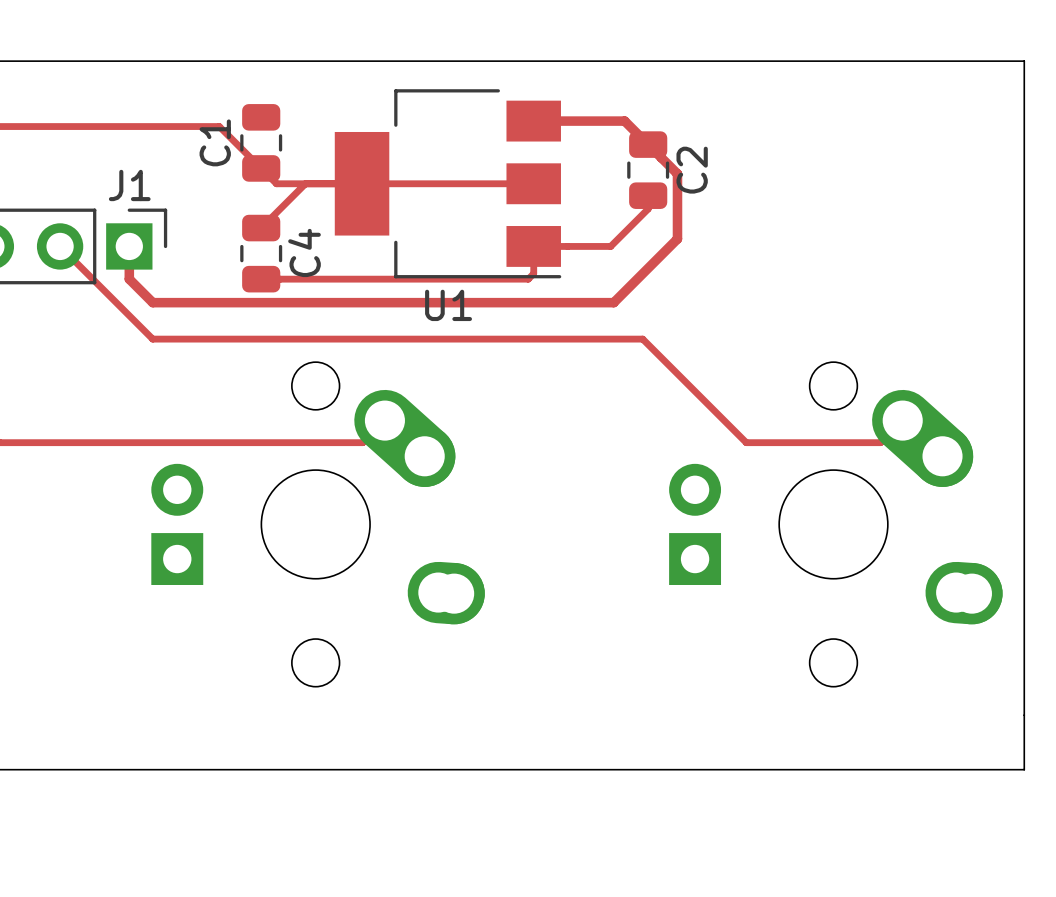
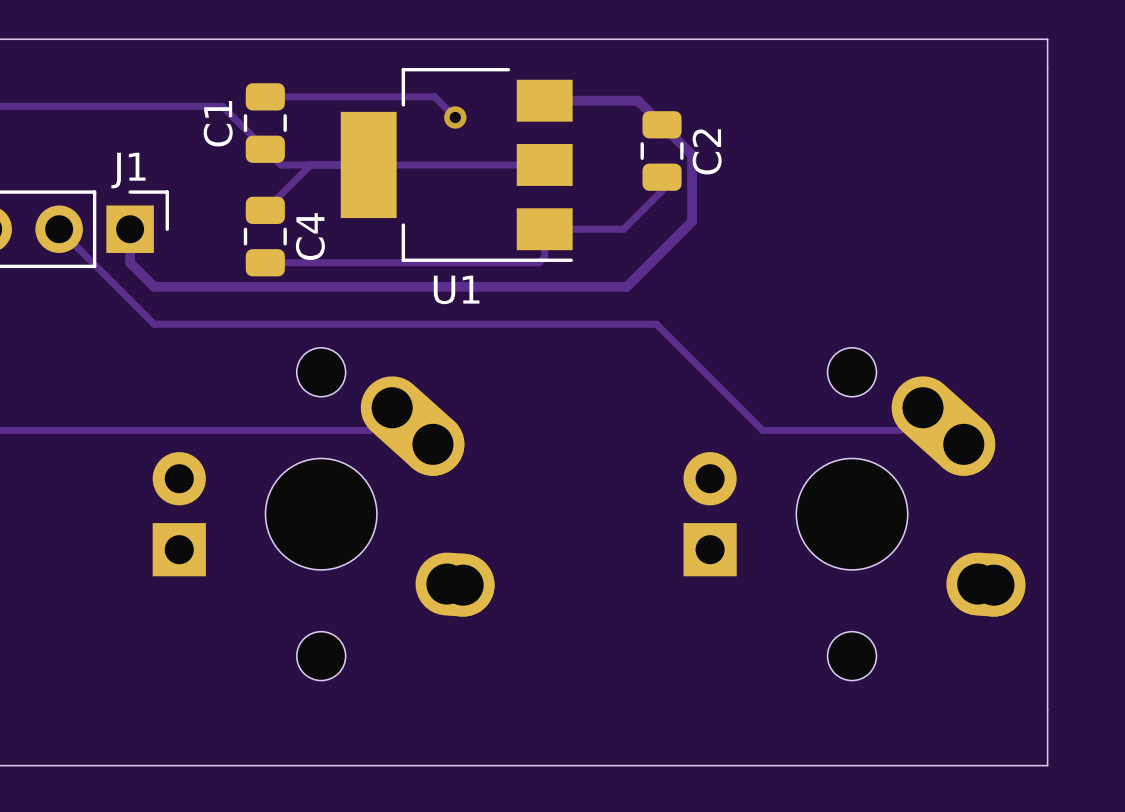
track: none -> (265, 96) (434, 96) (455, 117)
via: none -> (455, 117)

